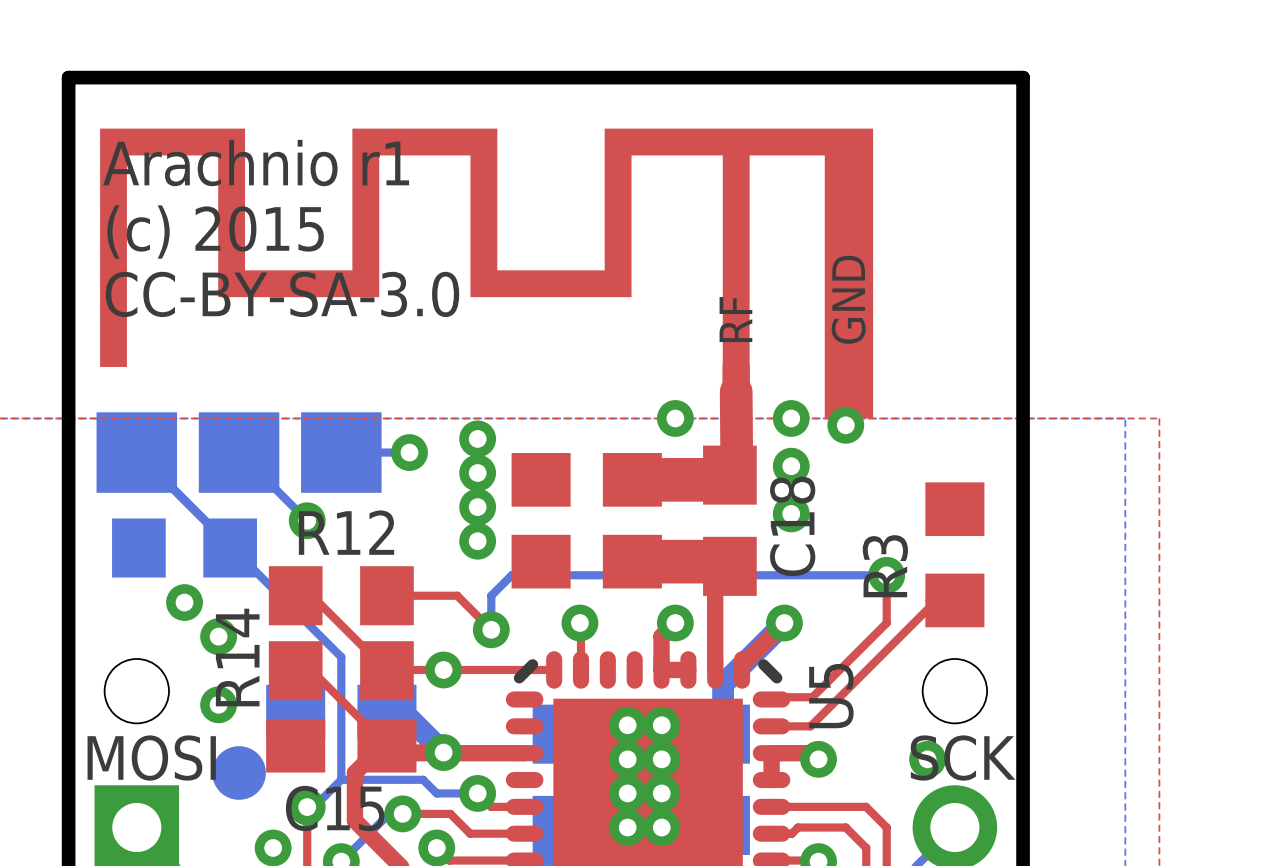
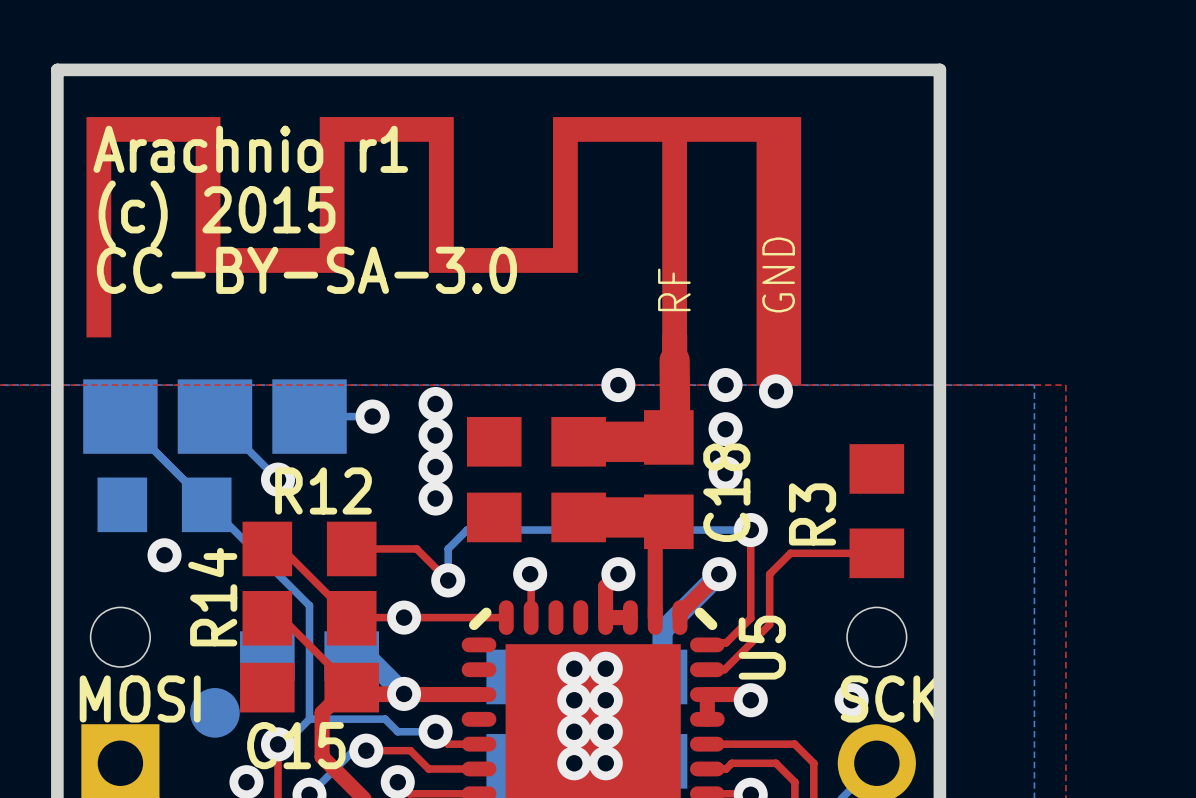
bottom track: (818, 575) (886, 575) -> none
top track: (886, 575) (886, 623) (812, 697) (792, 697) -> (750, 530) (750, 618) (726, 642)
via position: (886, 575) -> (750, 530)
top track: (929, 600) (941, 588) (941, 595) (810, 726) (790, 726) -> (853, 553) (790, 553) (769, 574) (769, 624) (724, 669)
via: (218, 636) -> none
via: (218, 704) -> none

